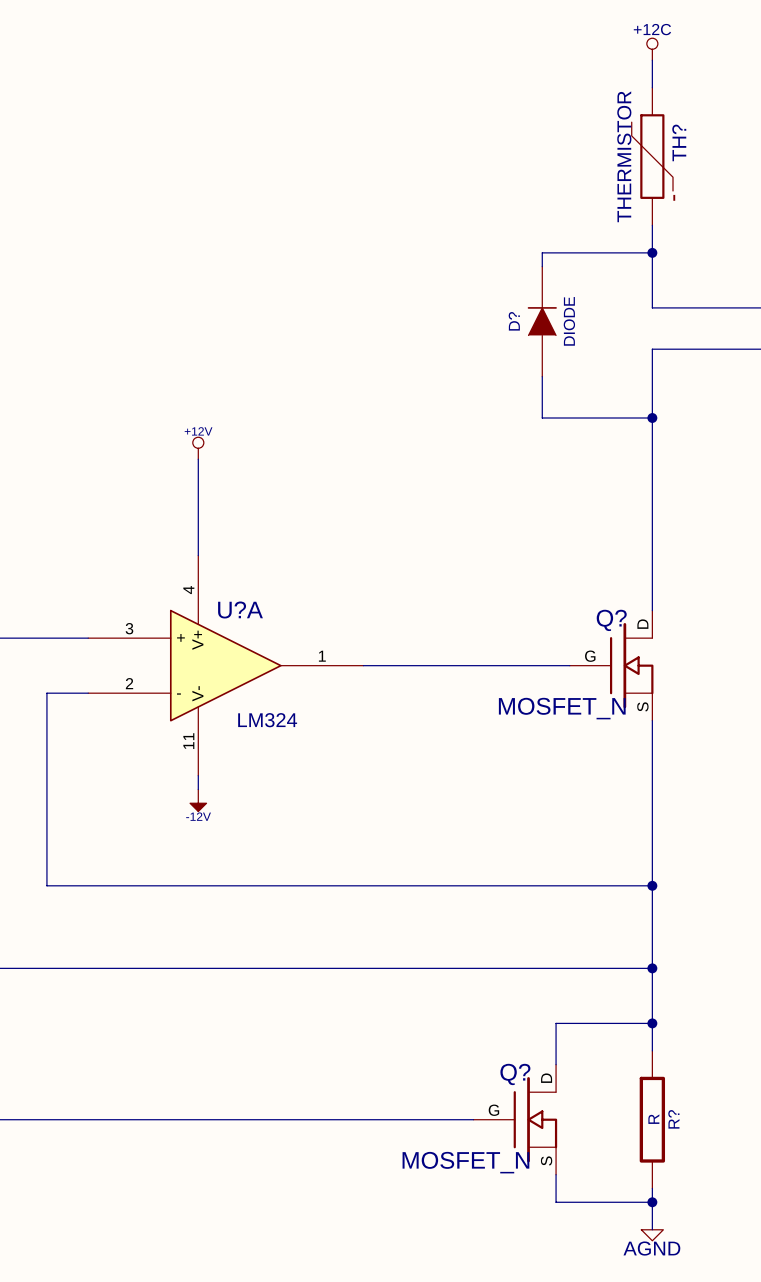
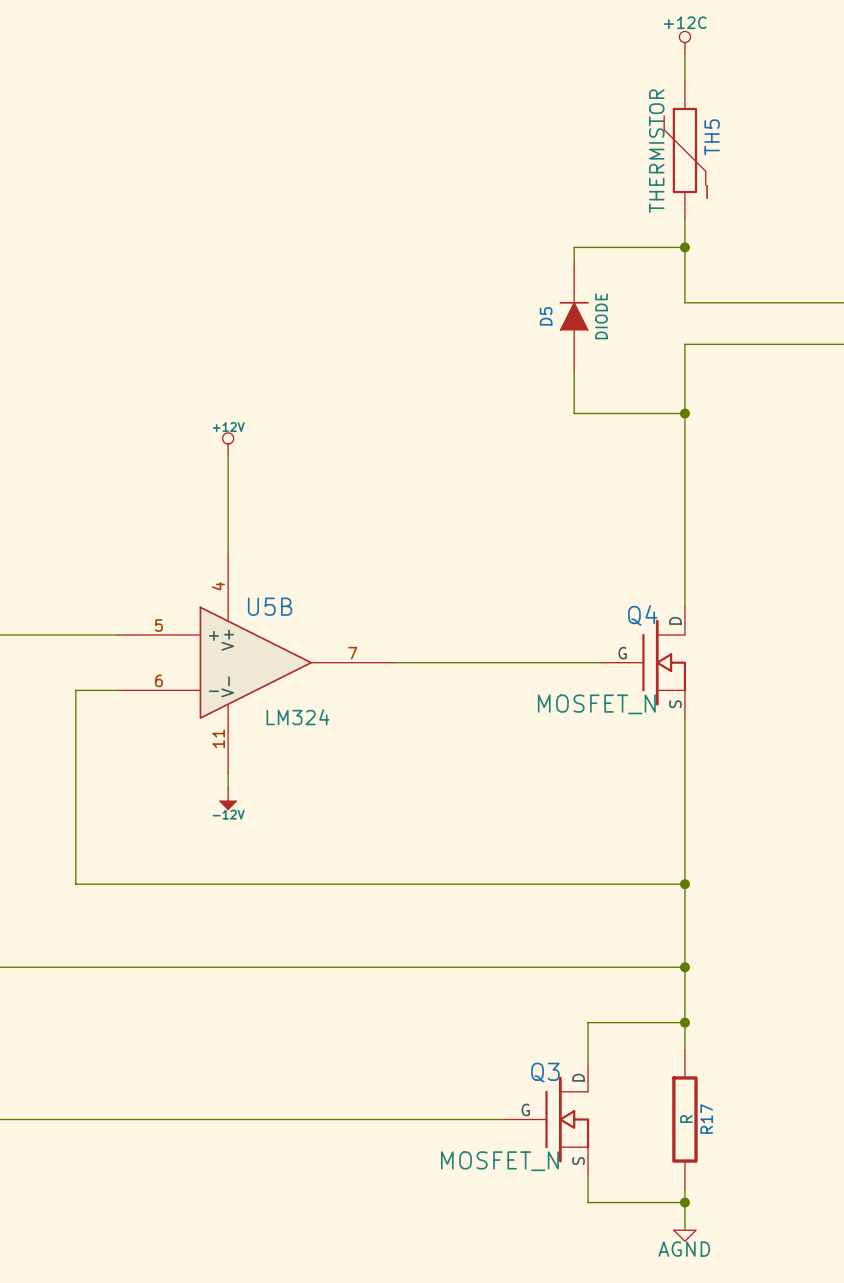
TH? name: TH? (679, 142) -> TH5 (712, 137)
D? name: D? (514, 321) -> D5 (546, 316)
U?A name: U?A (240, 610) -> U5B (270, 606)
Q? name: Q? (611, 620) -> Q4 (642, 615)
U?A pin number: 3 (129, 628) -> 5 (158, 625)
U?A pin number: 1 (322, 656) -> 7 (352, 653)
U?A pin number: 2 (129, 683) -> 6 (158, 680)
Q? name: Q? (515, 1074) -> Q3 (545, 1072)
R? name: R? (673, 1119) -> R17 (706, 1118)

